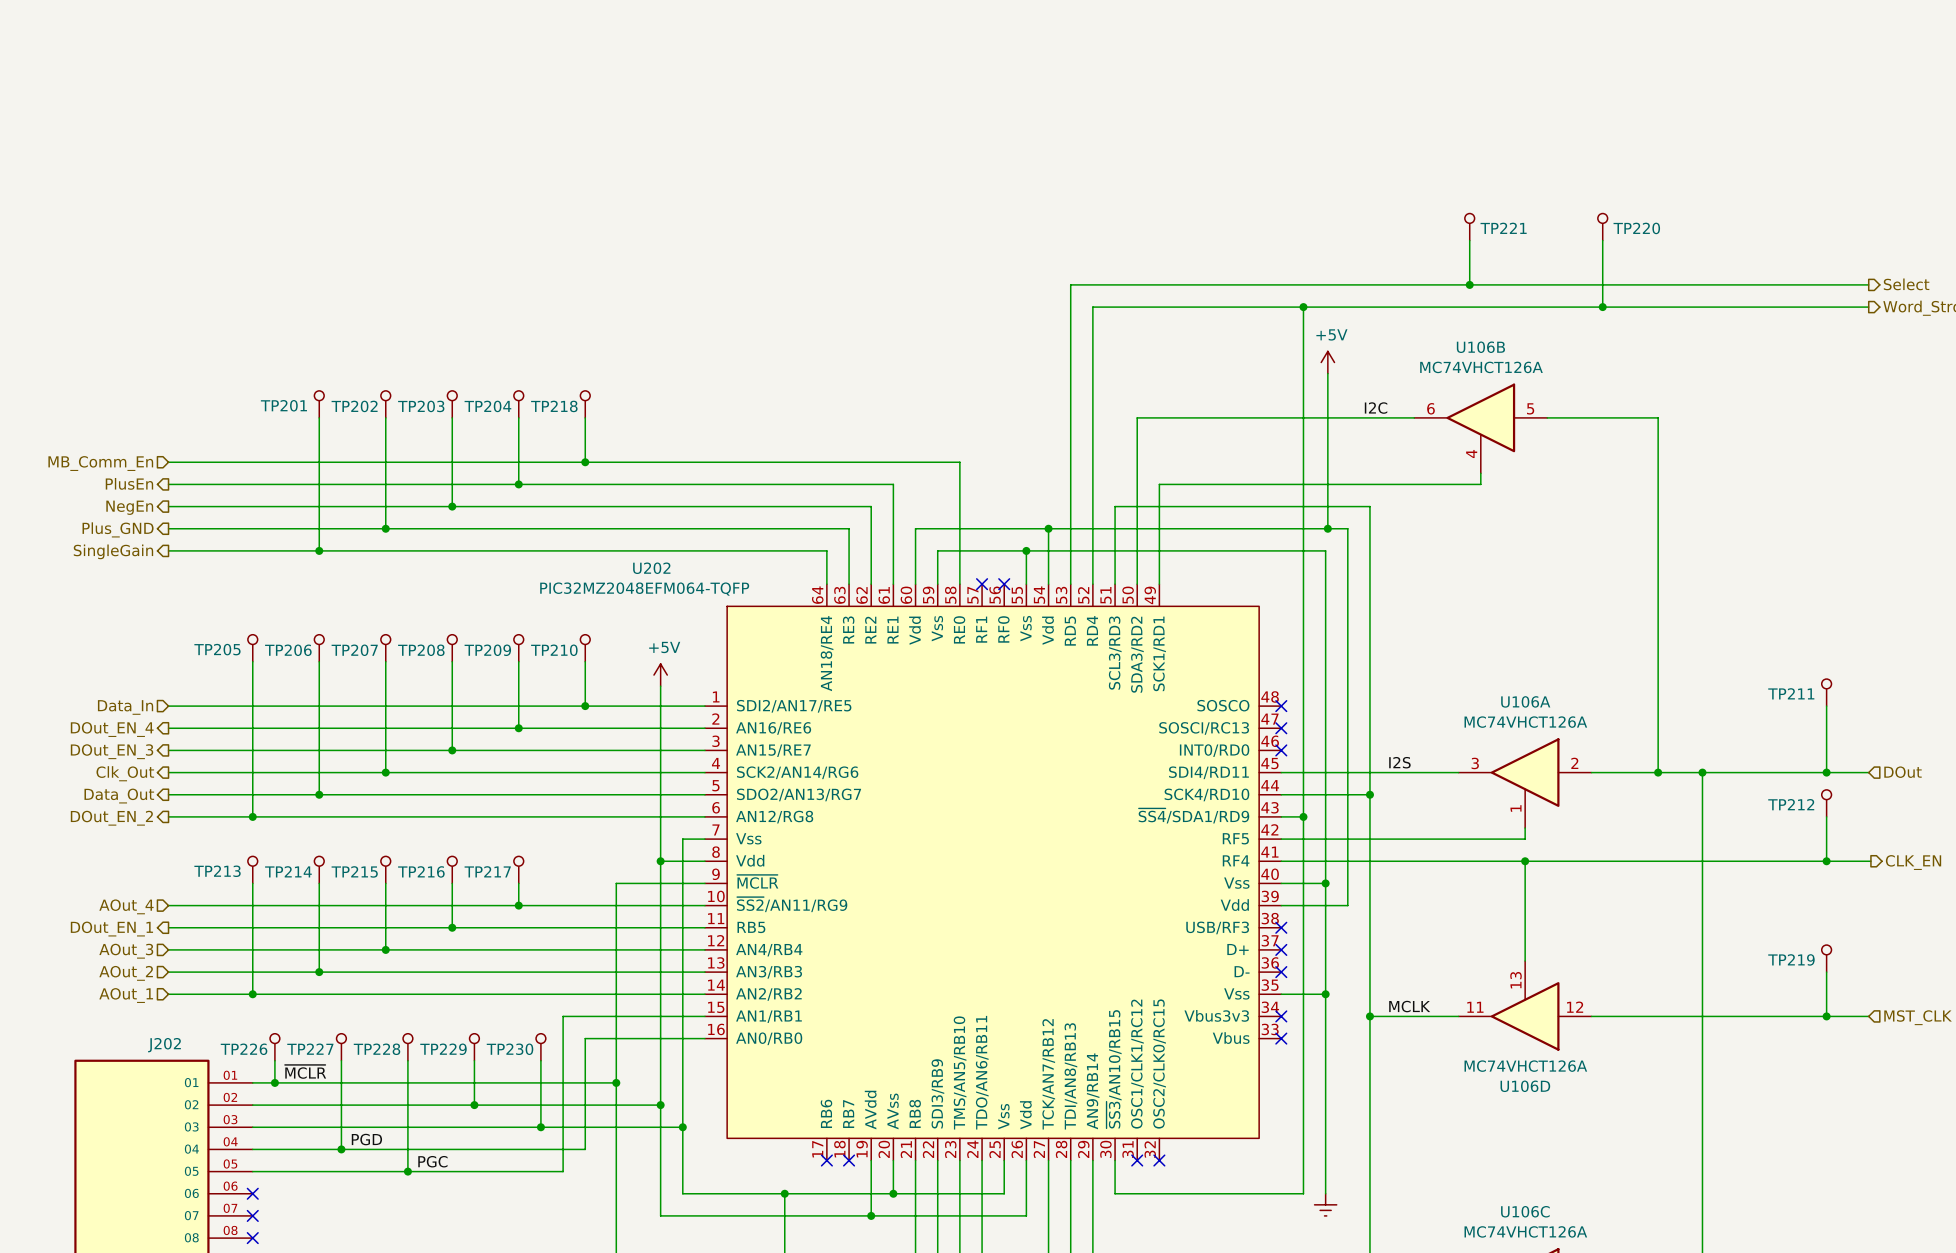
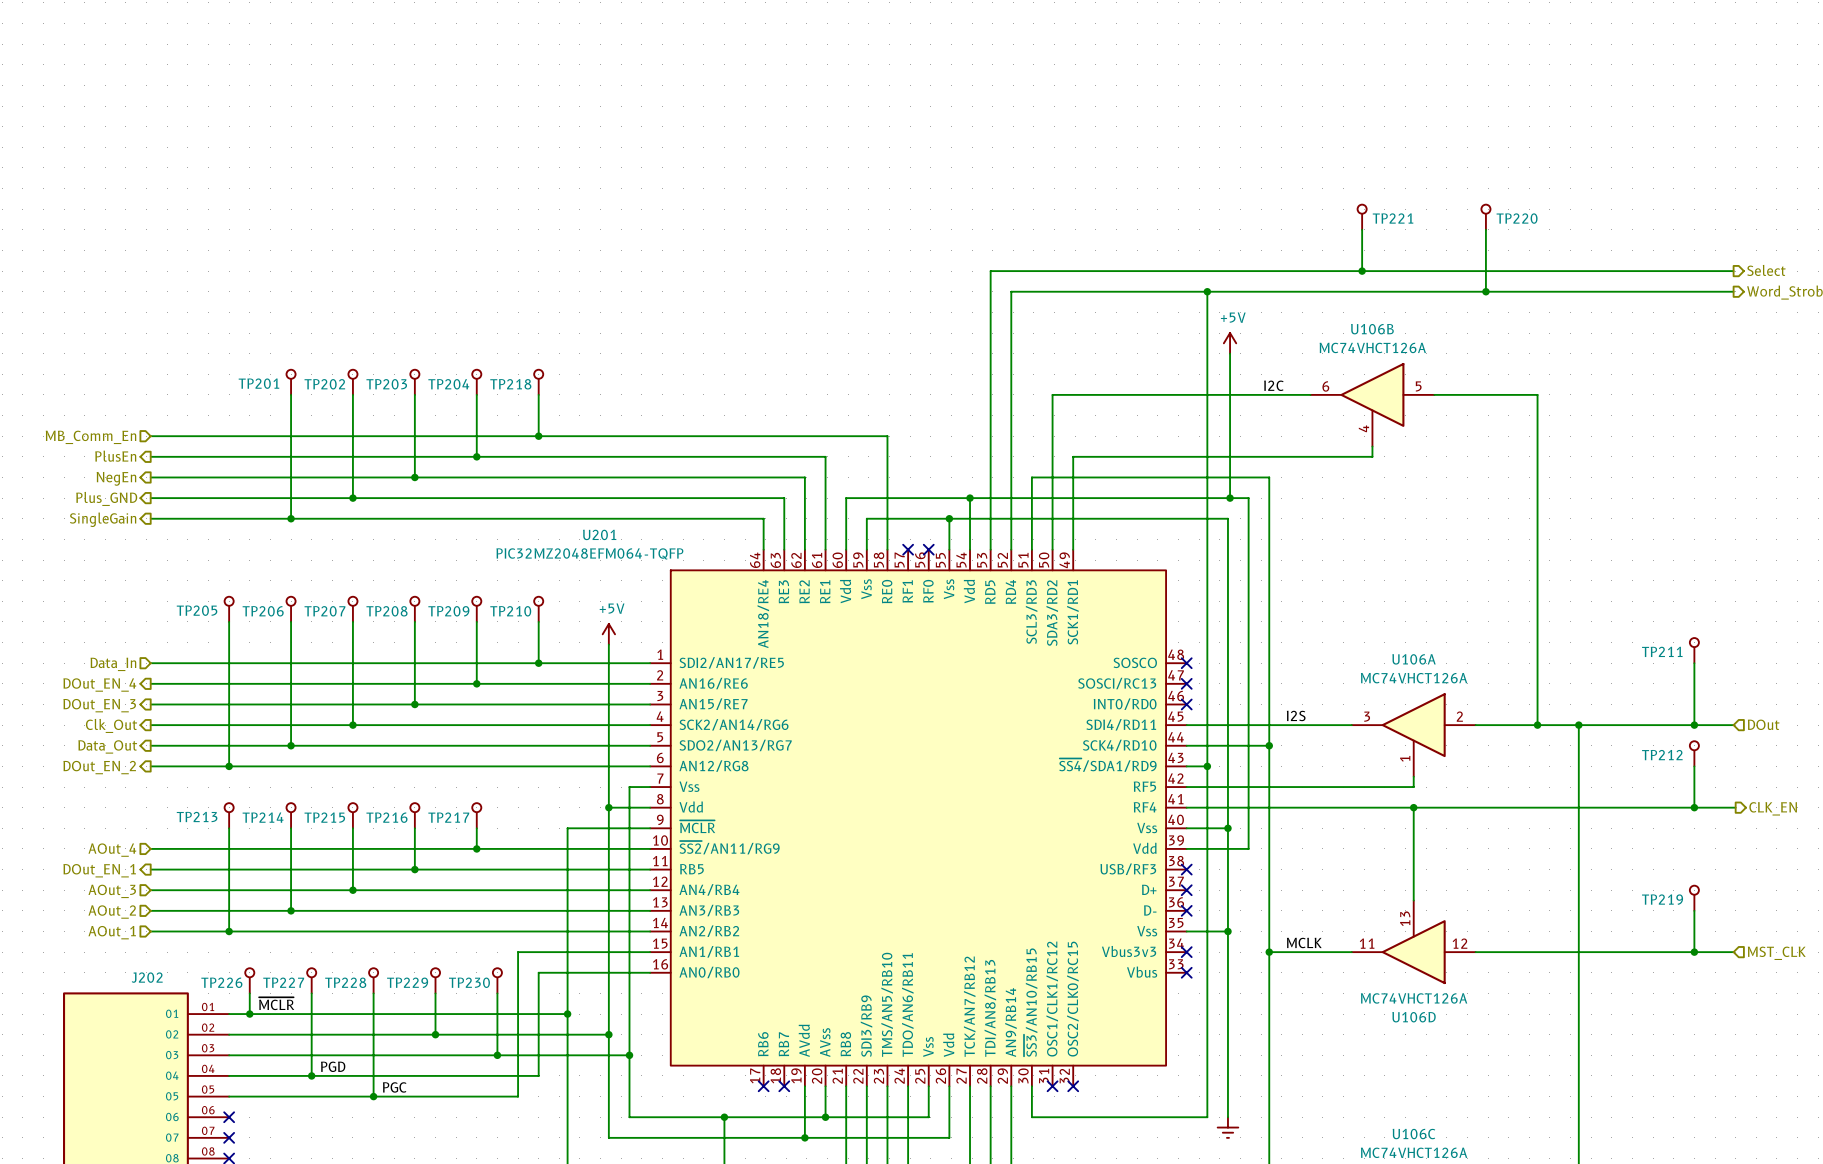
U202 name: U202 (651, 568) -> U201 (599, 534)

